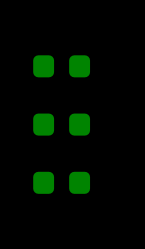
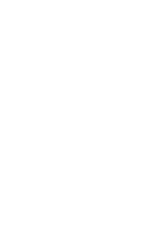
part: (61, 66) -> none
part: (61, 124) -> none
part: (61, 182) -> none

